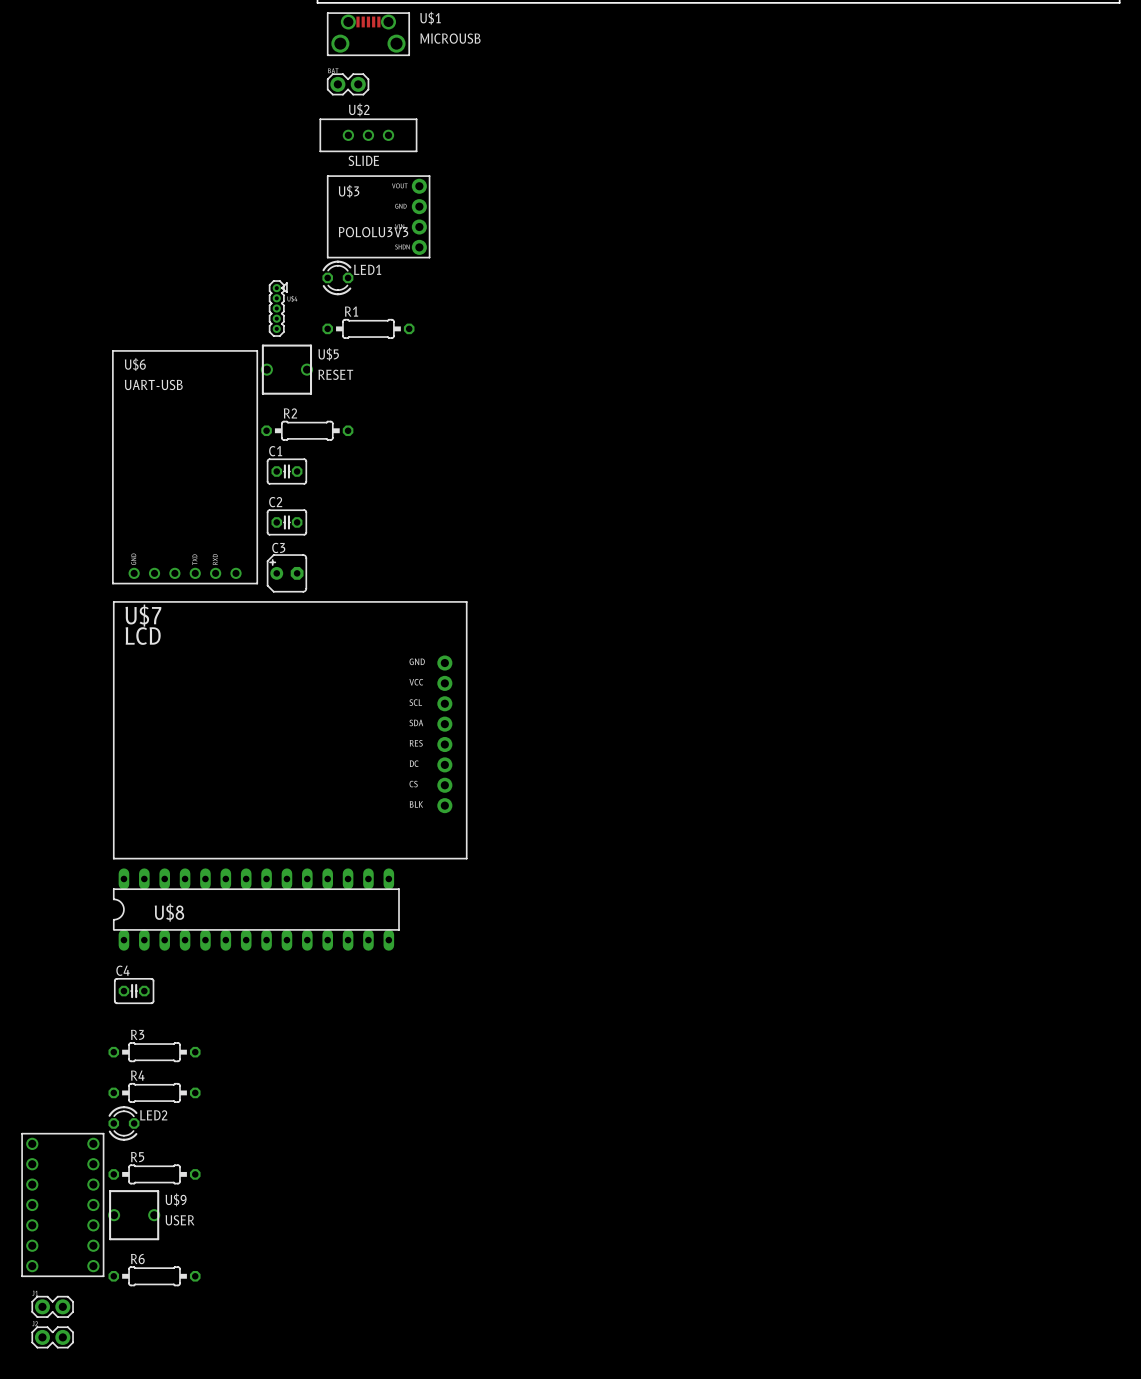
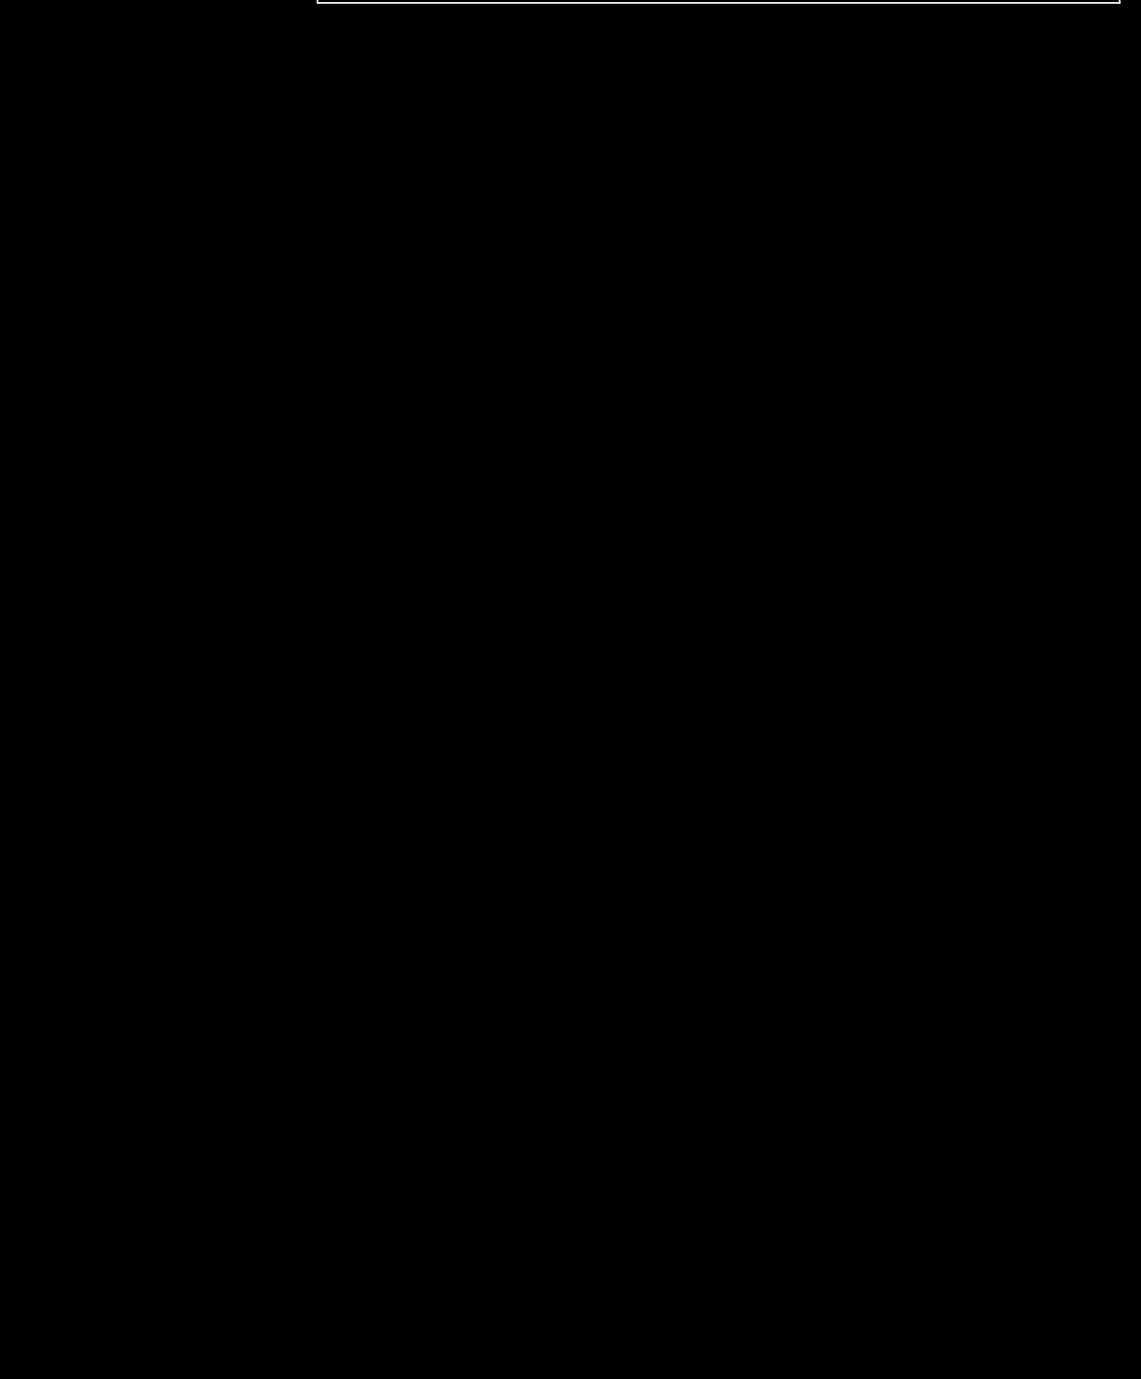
U$1: MICROUSB (368, 34) -> none
part: (348, 84) -> none
U$2: SLIDE (368, 135) -> none
U$3: POLOLU3V3 (378, 216) -> none
LED1: (337, 277) -> none
part: (278, 308) -> none
R1: (368, 328) -> none
U$5: RESET (286, 369) -> none
R2: (307, 430) -> none
U$6: UART-USB (185, 467) -> none
C1: (286, 471) -> none
C2: (286, 522) -> none
C3: (286, 573) -> none
U$7: LCD (290, 730) -> none
U$8: (256, 909) -> none
C4: (134, 991) -> none
R3: (154, 1052) -> none
R4: (154, 1092) -> none
LED2: (123, 1123) -> none
R5: (154, 1174) -> none
part: (62, 1204) -> none
U$9: USER (134, 1215) -> none
R6: (154, 1276) -> none
part: (52, 1306) -> none
part: (52, 1337) -> none

